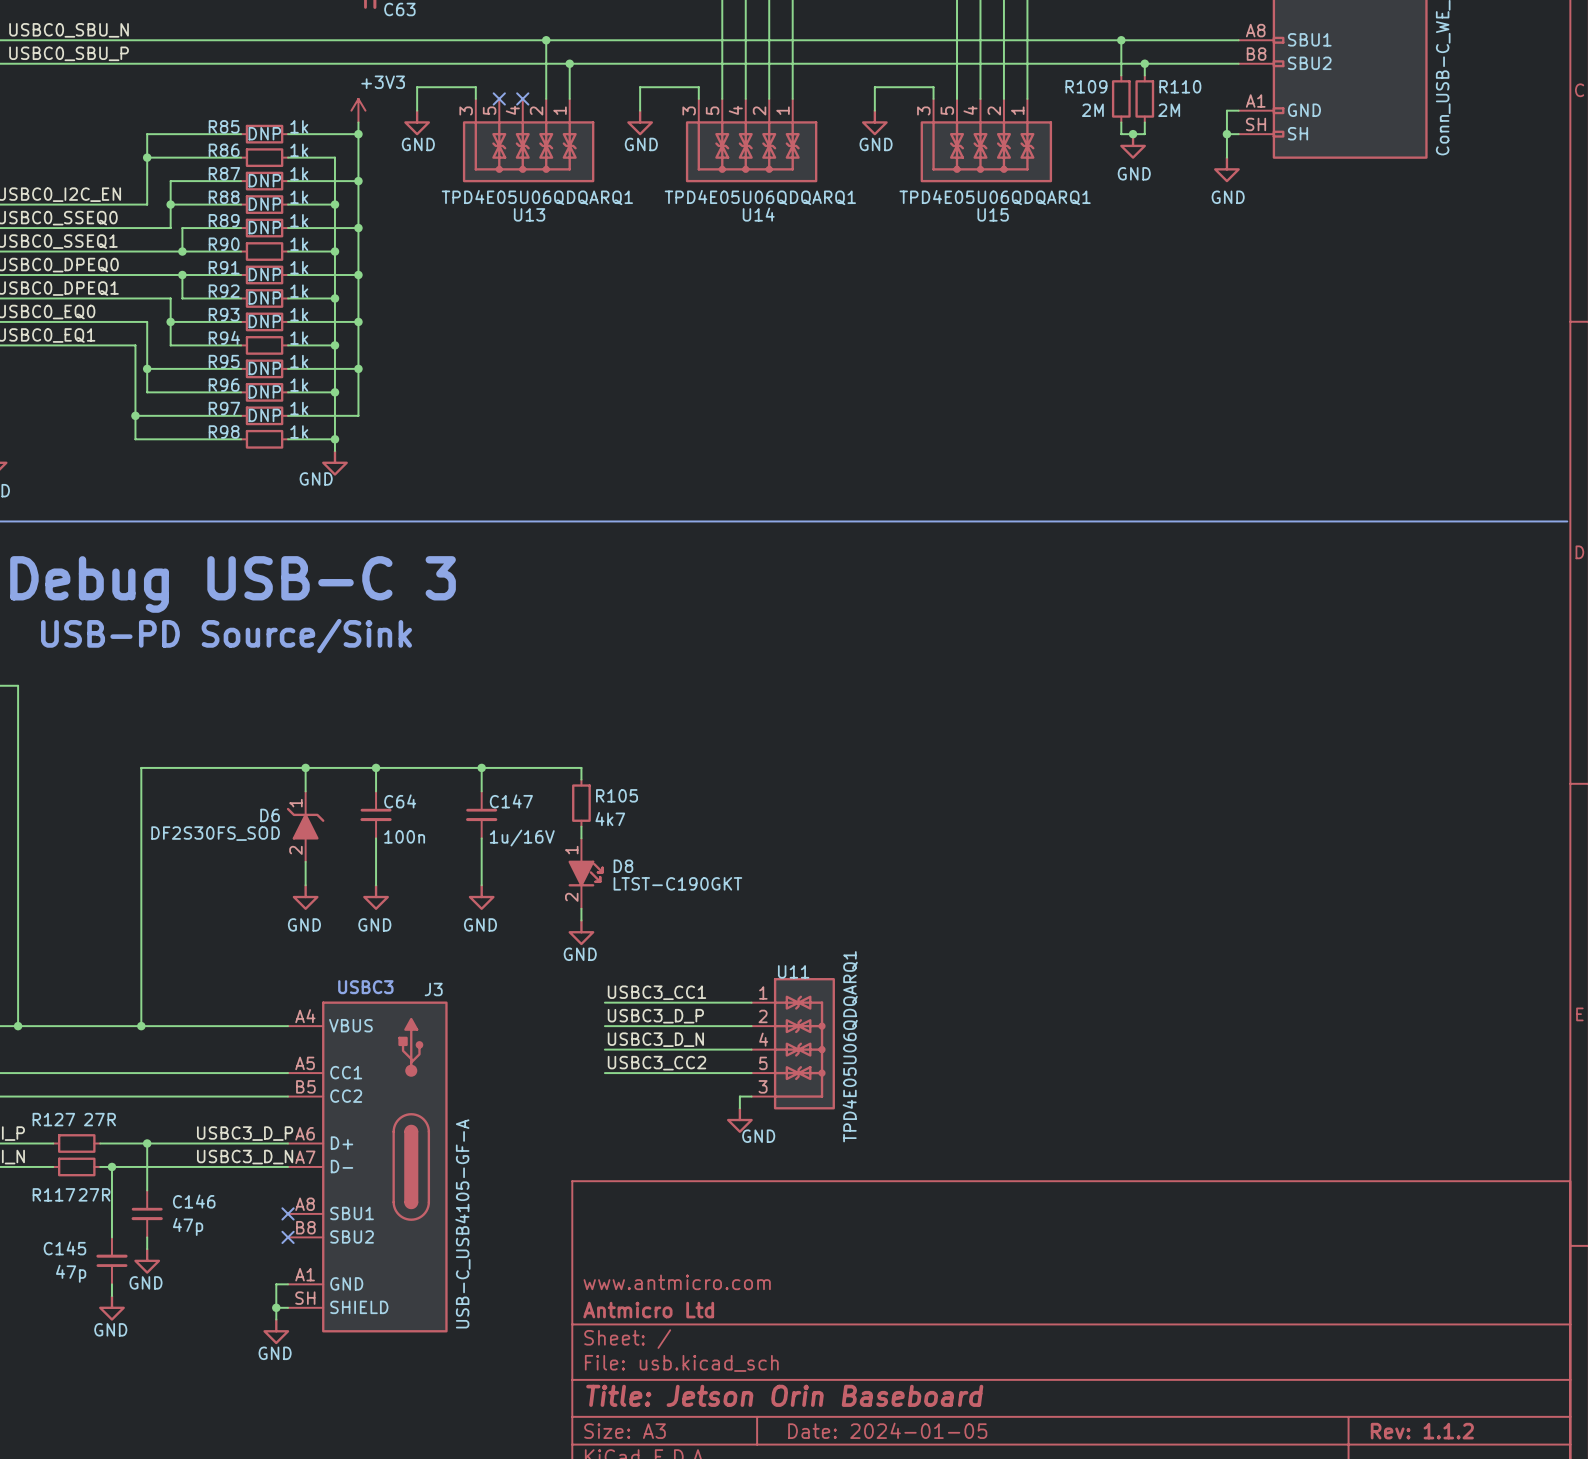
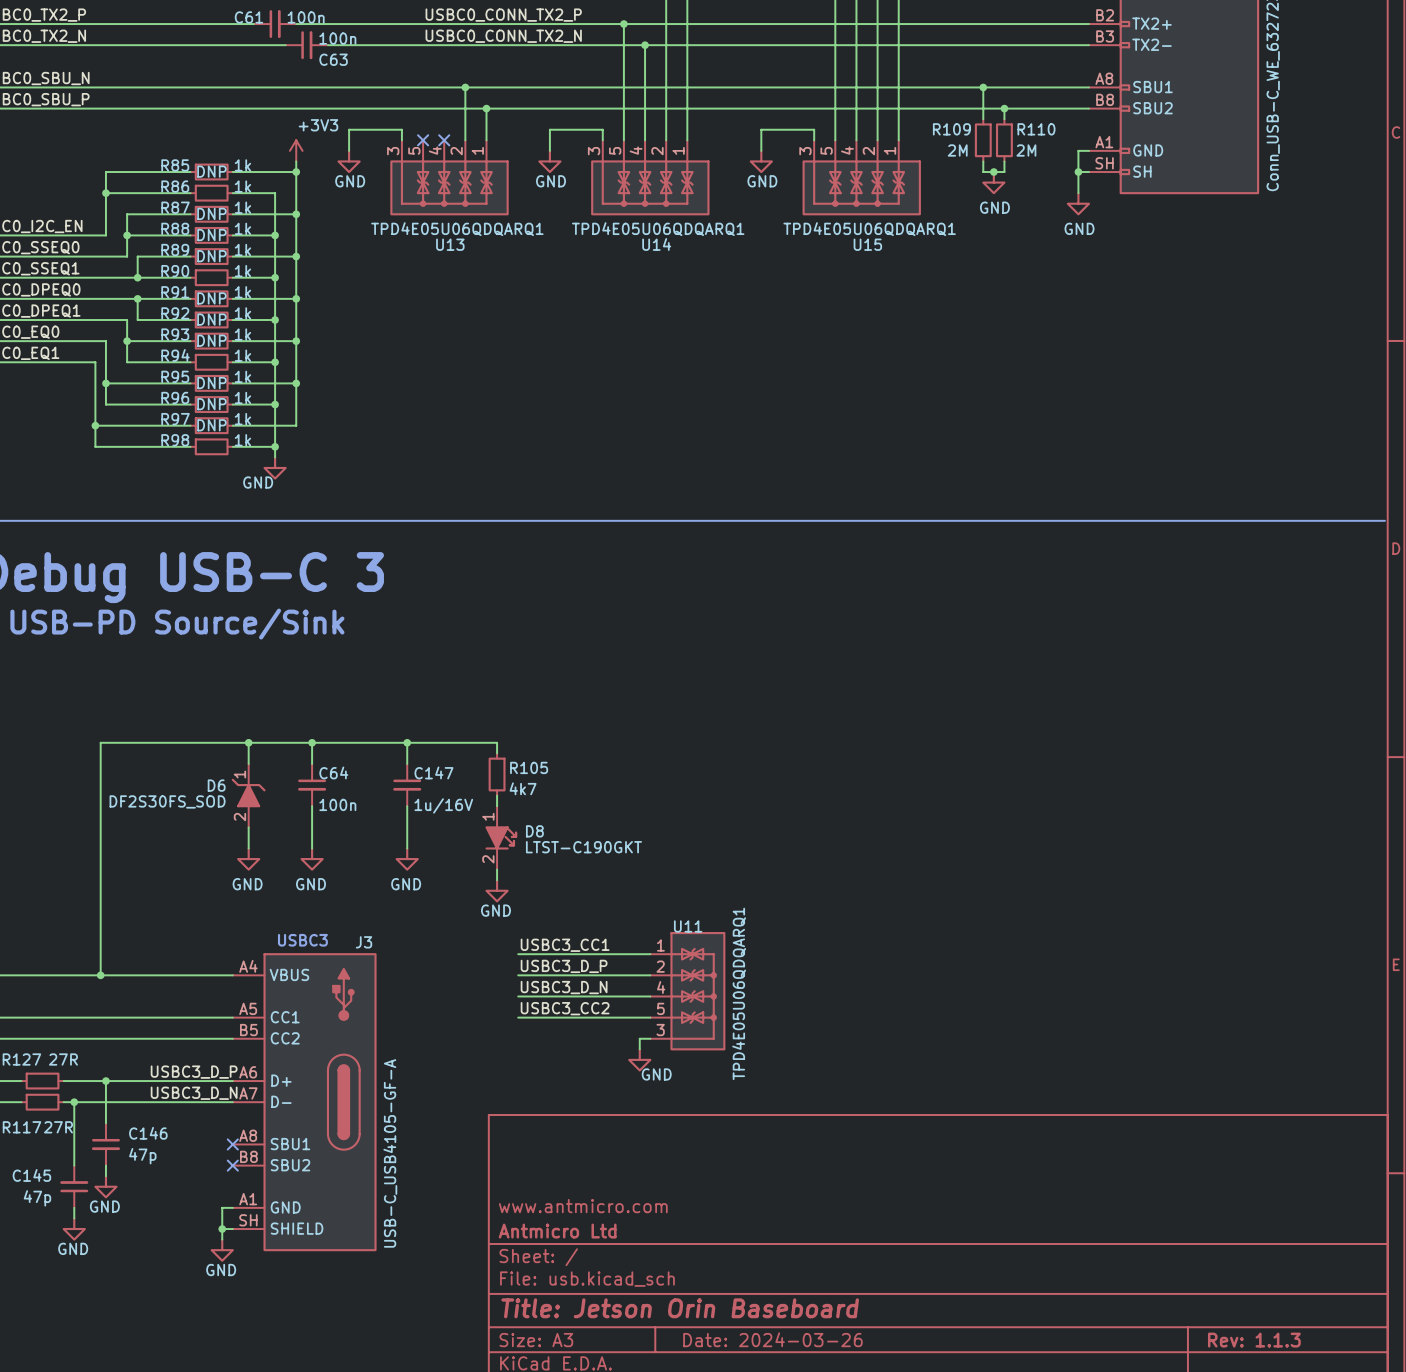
title block: Date: 2024-01-05 (887, 1430) -> Date: 2024-03-26 (772, 1339)
title block: Rev: 1.1.2 (1422, 1431) -> Rev: 1.1.3 (1254, 1340)

